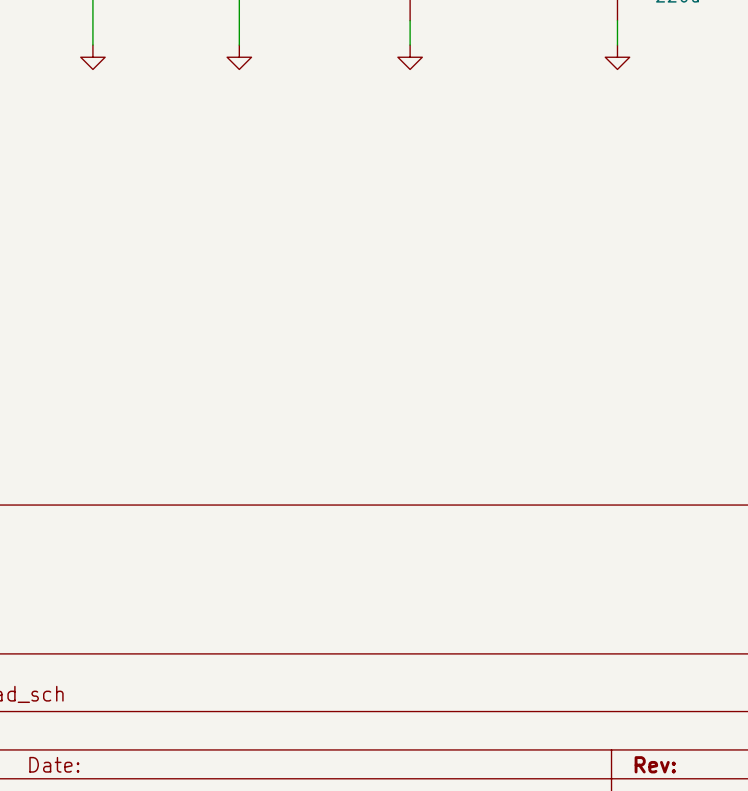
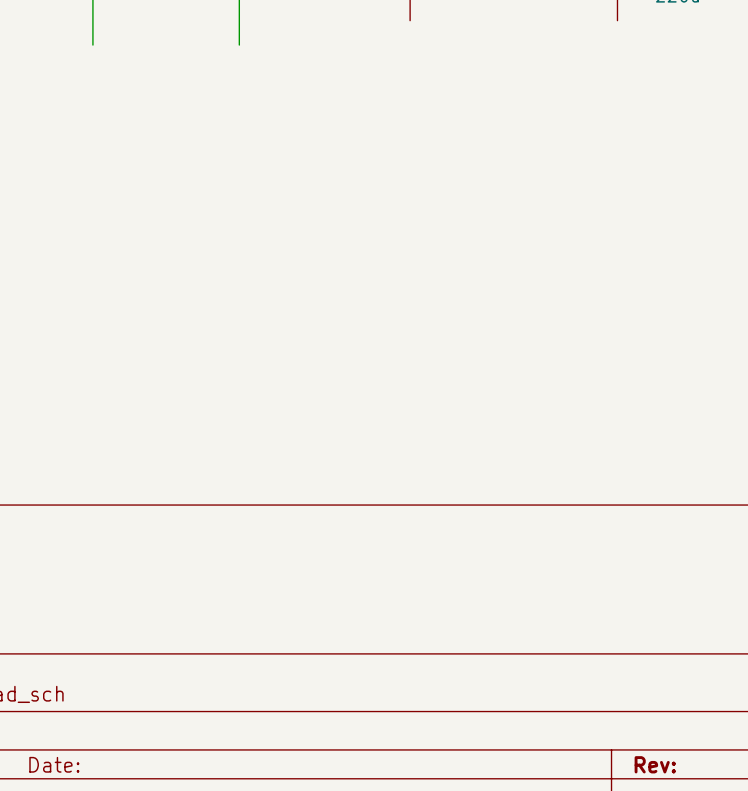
wire: (410, 20) (410, 45) -> none
wire: (617, 20) (617, 45) -> none
power symbol: (92, 57) -> none
power symbol: (239, 57) -> none
power symbol: (410, 57) -> none
power symbol: (617, 57) -> none

